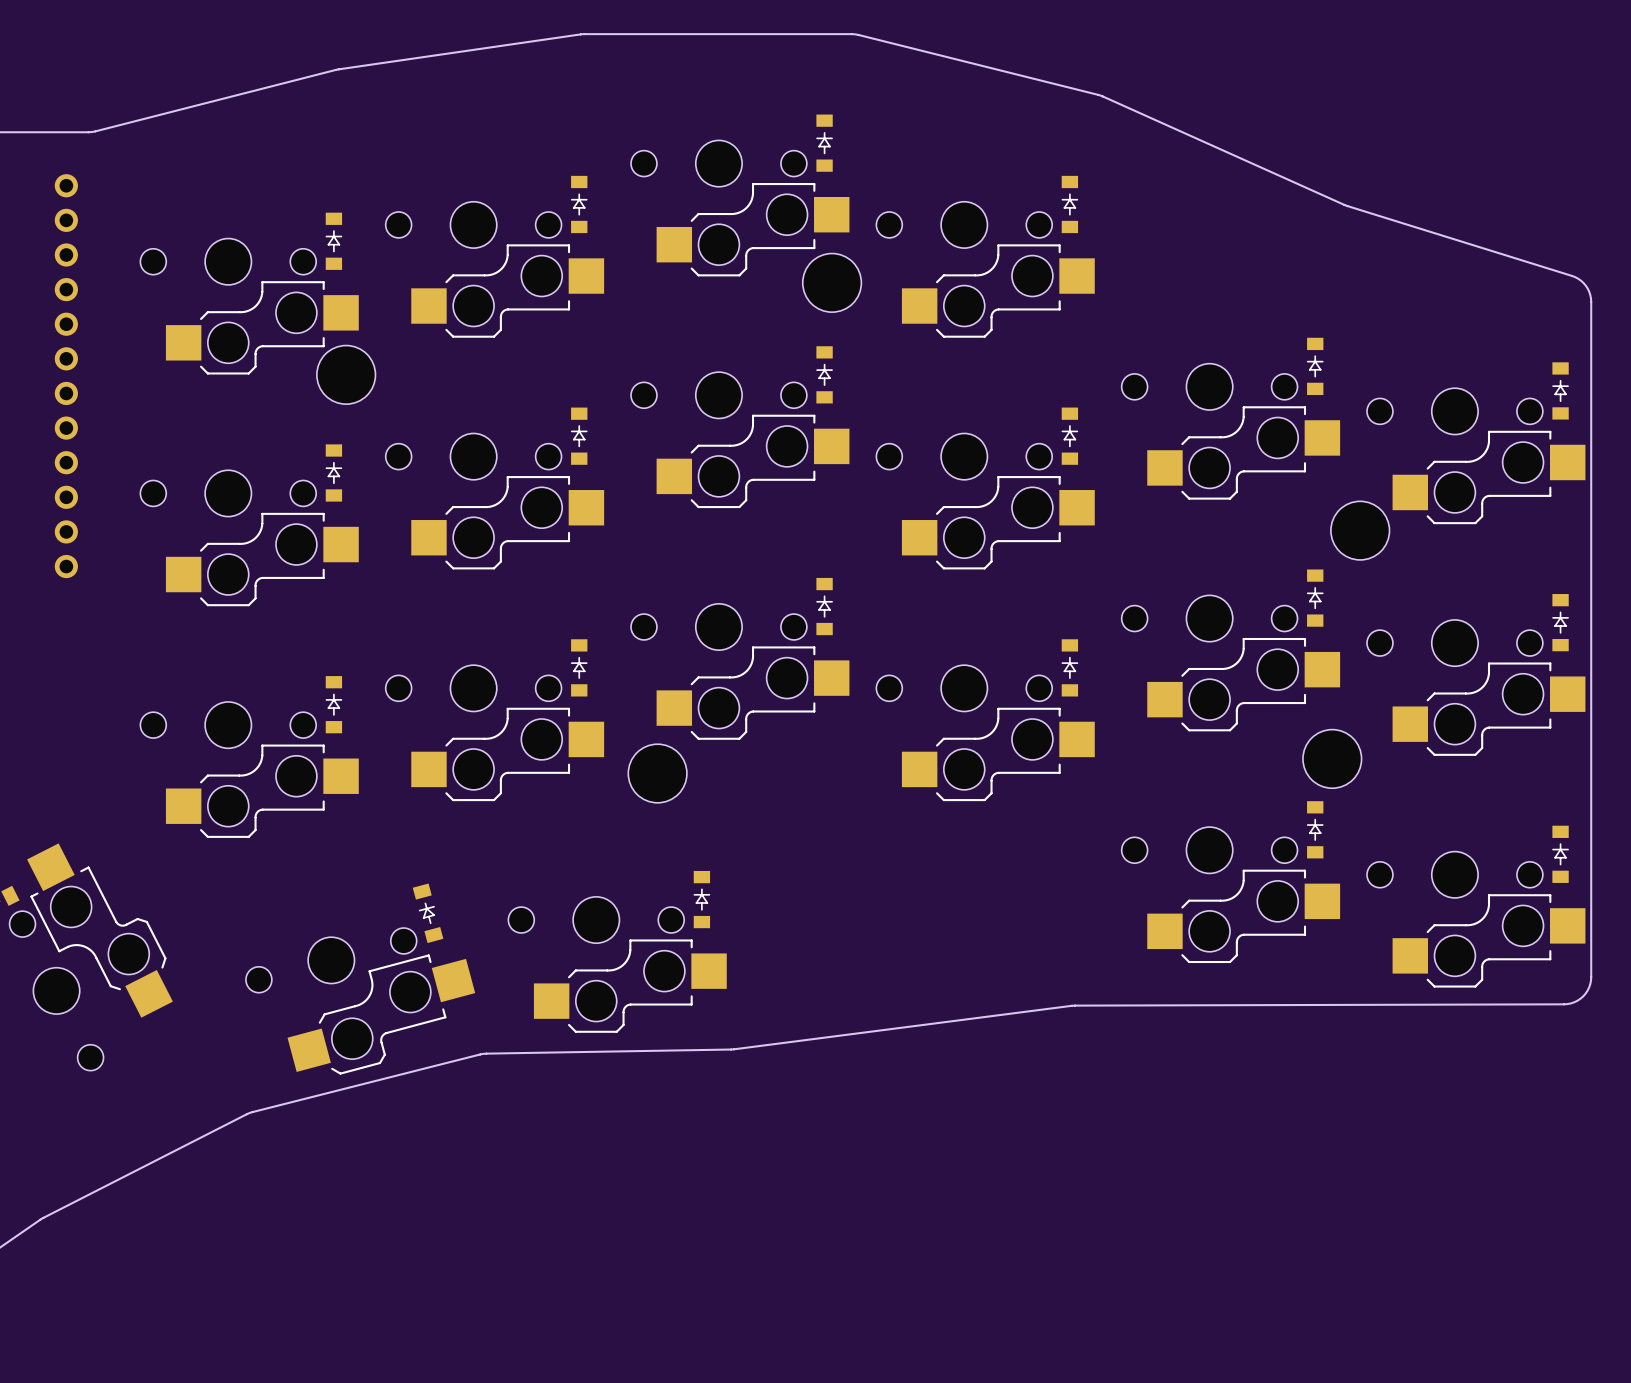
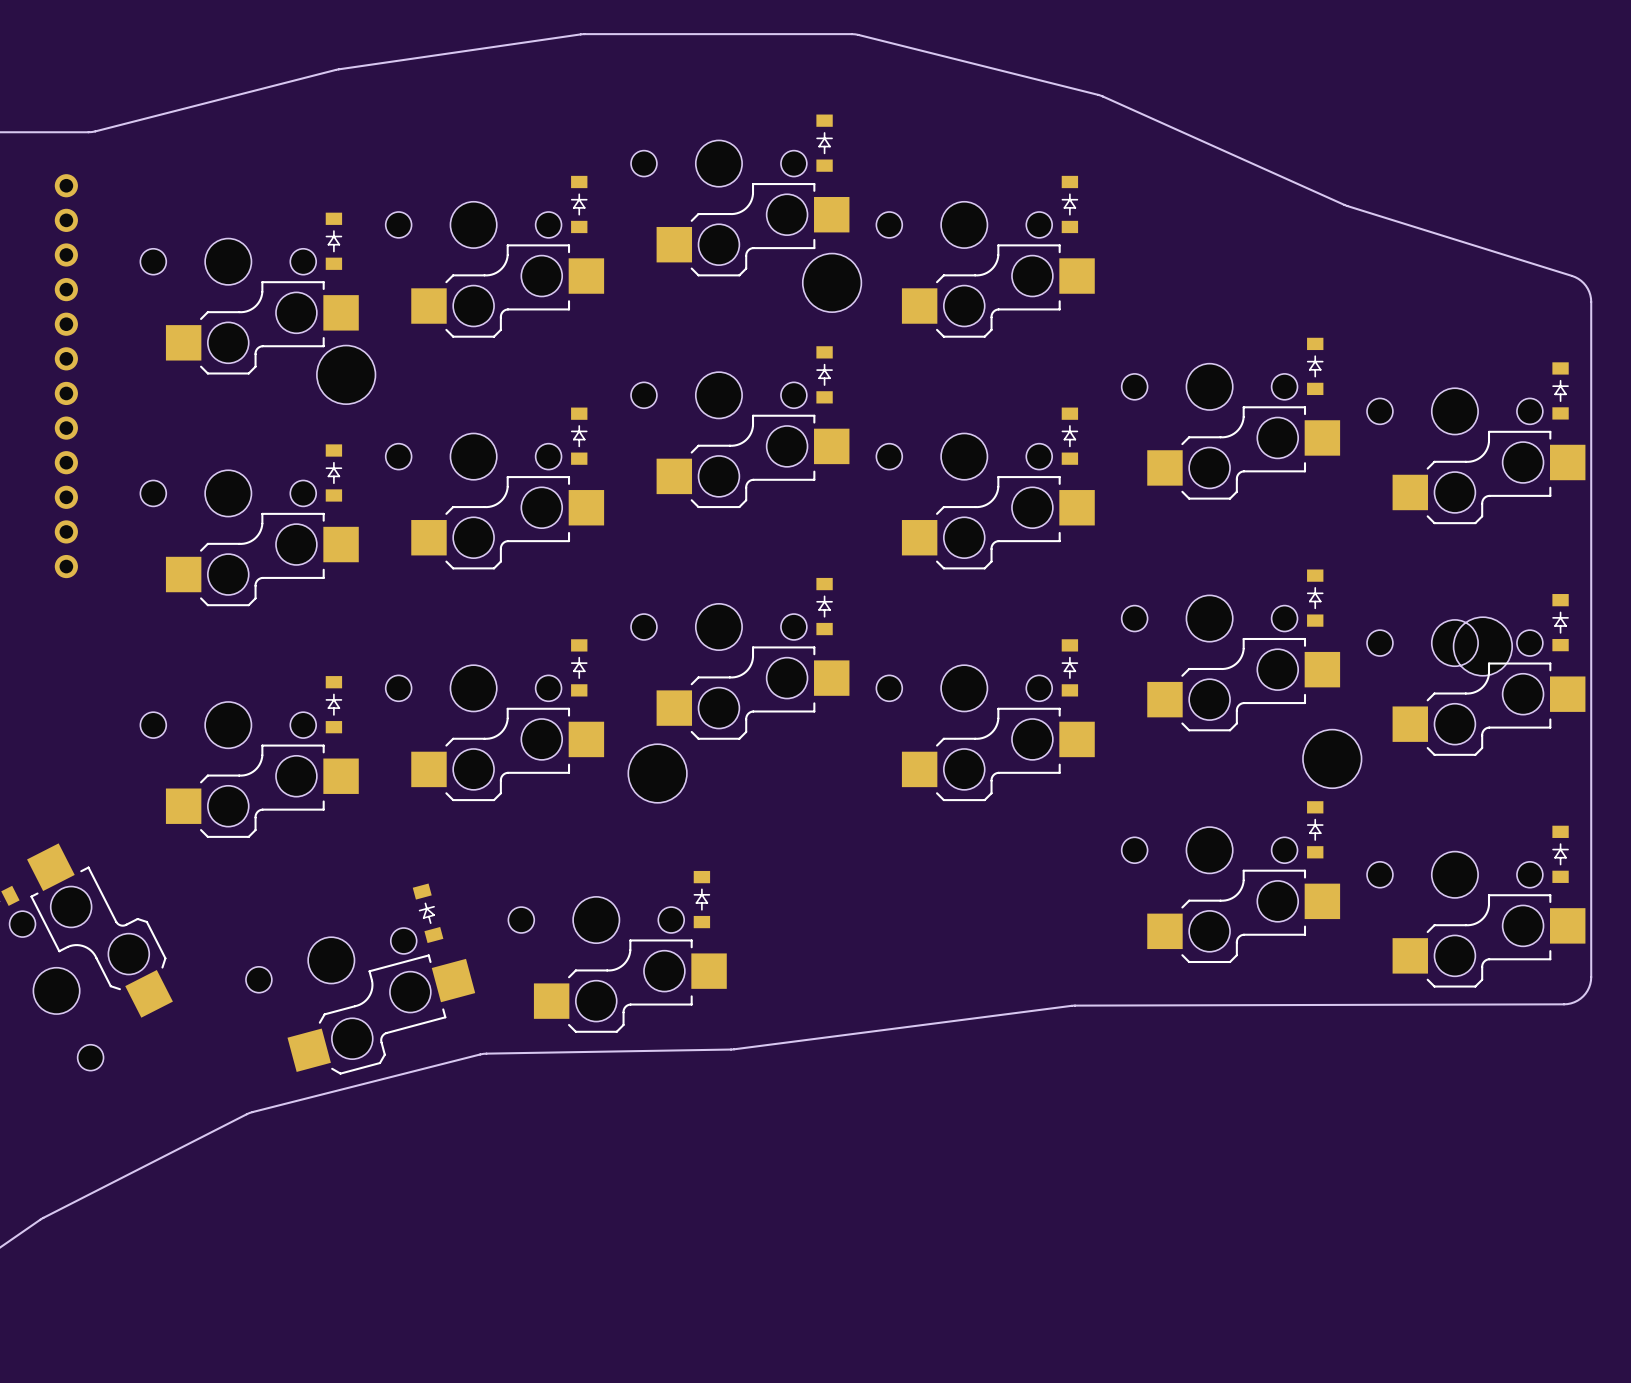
part position: (1360, 530) -> (1482, 646)

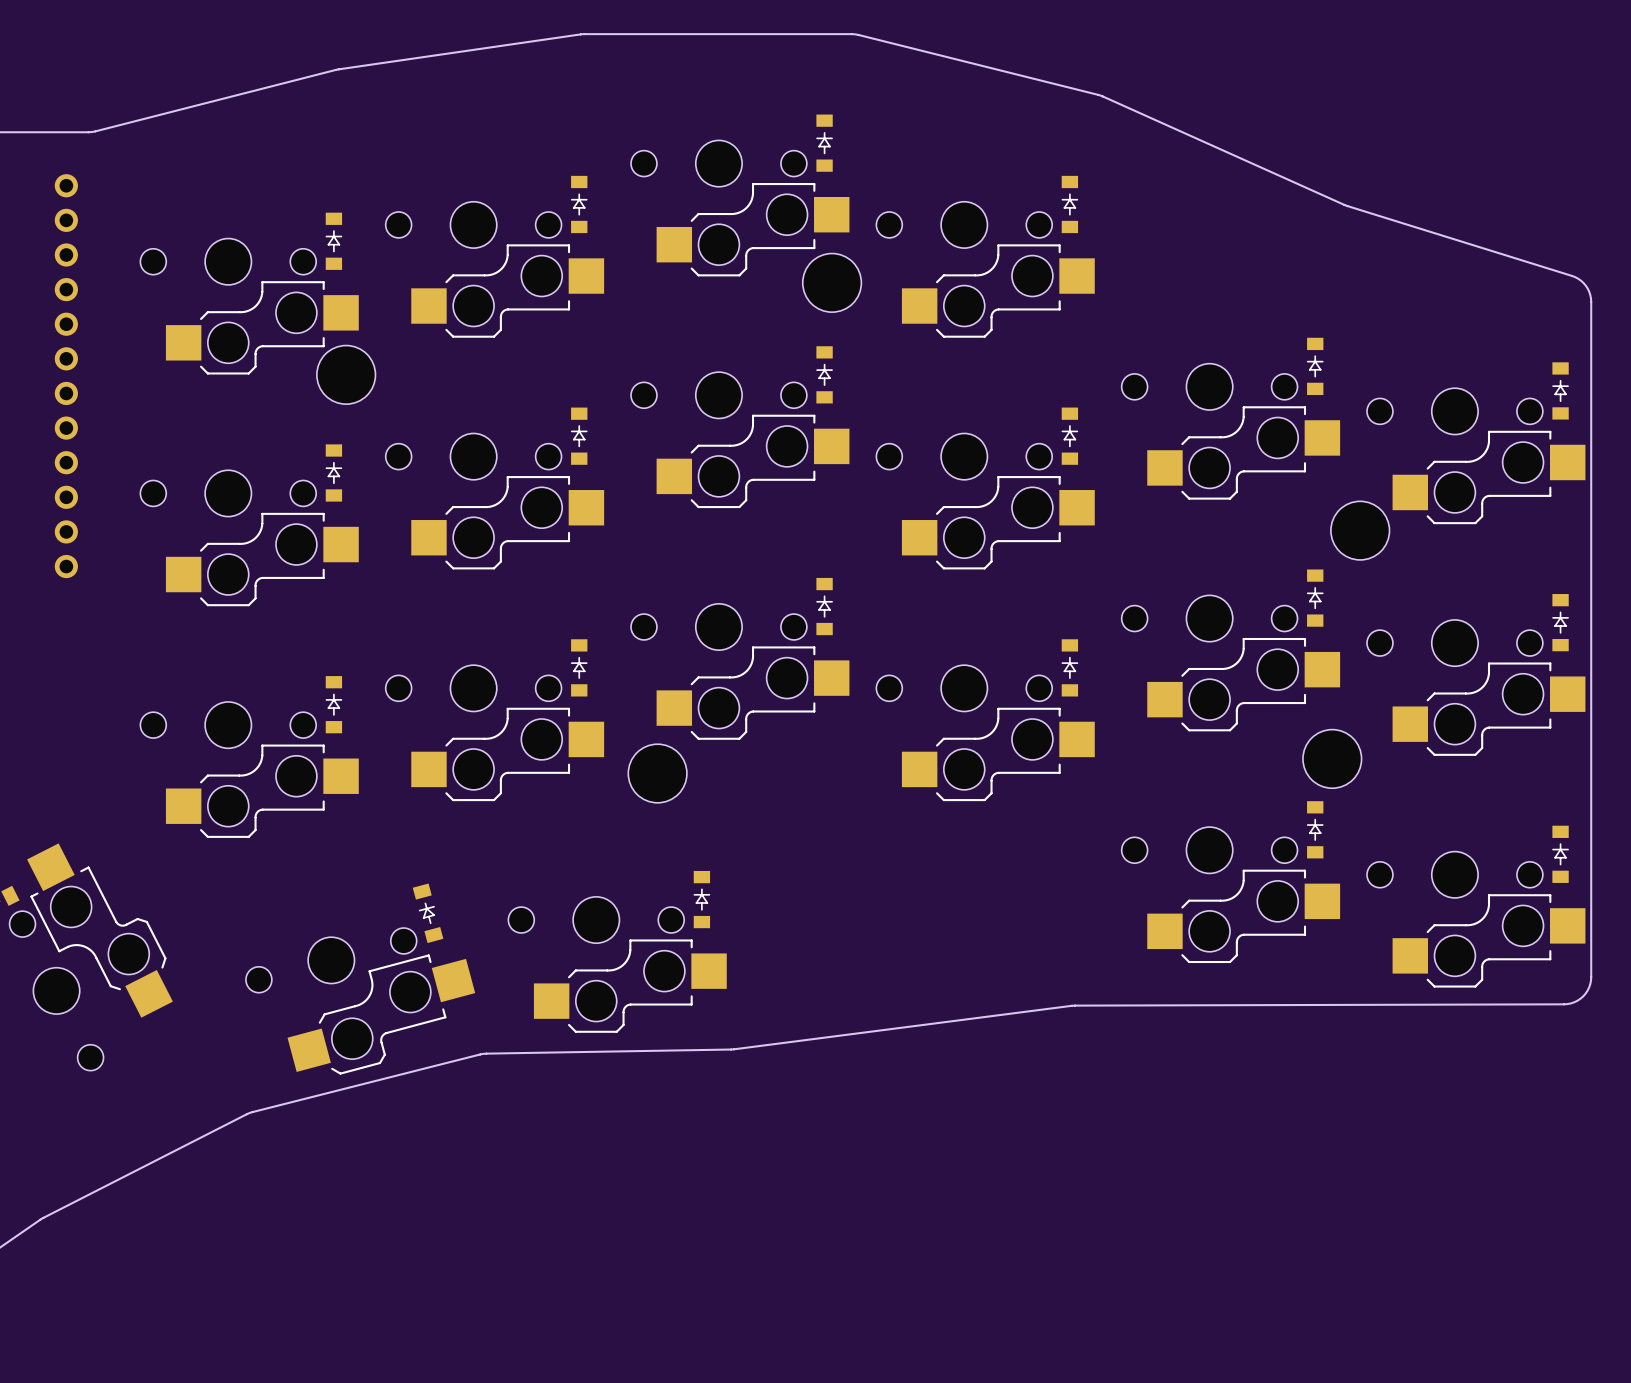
part position: (1482, 646) -> (1360, 530)

